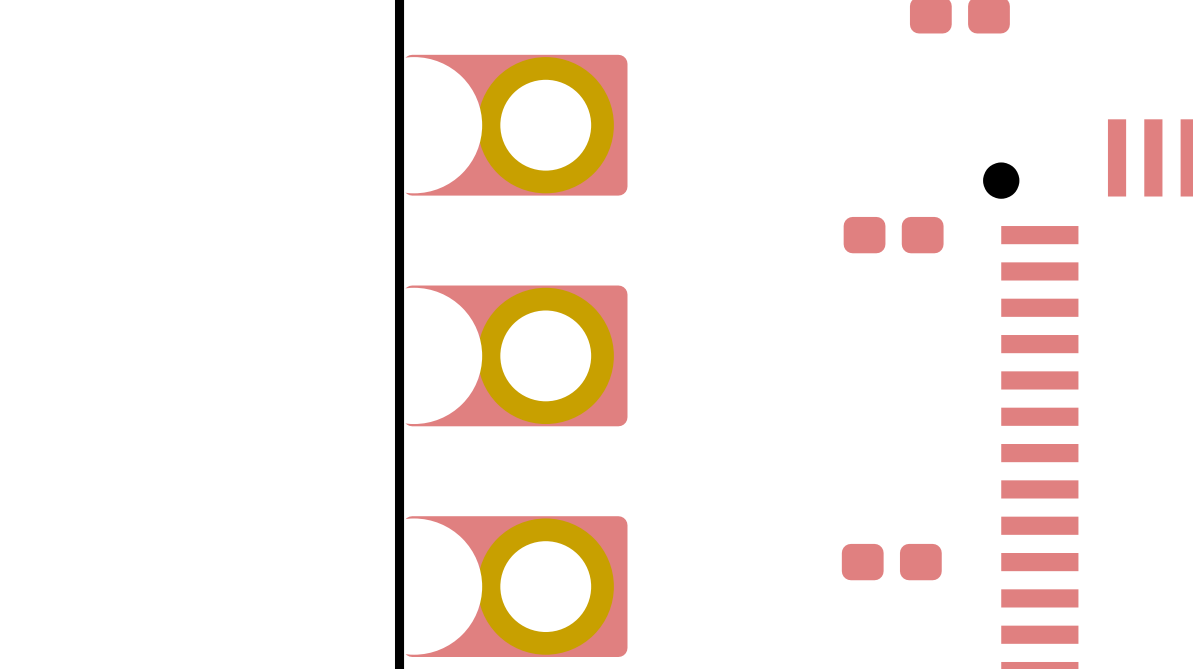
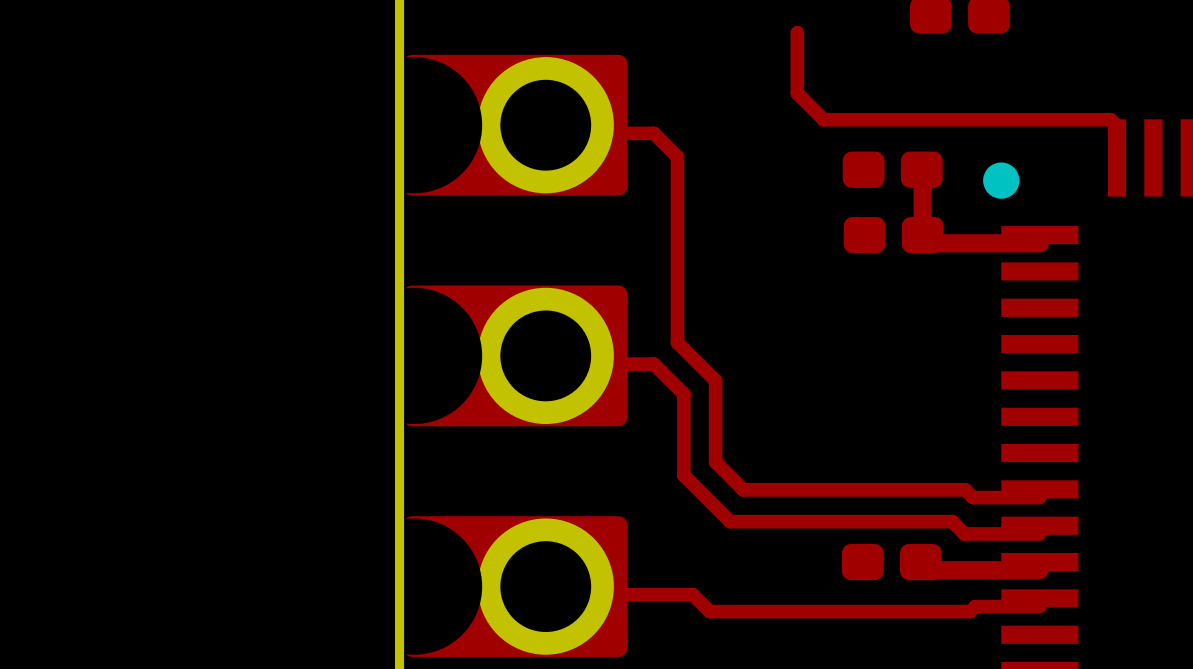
track: none -> (797, 32) (797, 93) (823, 119) (1110, 119) (1117, 126) (1117, 166)
track: none -> (545, 133) (653, 133) (677, 157) (677, 342) (715, 380) (715, 462) (743, 489) (965, 489) (973, 497) (1039, 497)
part: none -> (892, 169)
track: none -> (922, 170) (922, 243) (1039, 243)
track: none -> (545, 364) (653, 364) (683, 394) (683, 475) (730, 521) (952, 521) (964, 533) (1039, 533)
track: none -> (920, 564) (926, 570) (1039, 570)
track: none -> (557, 606) (545, 594) (692, 594) (709, 611) (970, 611) (975, 606) (1039, 606)

